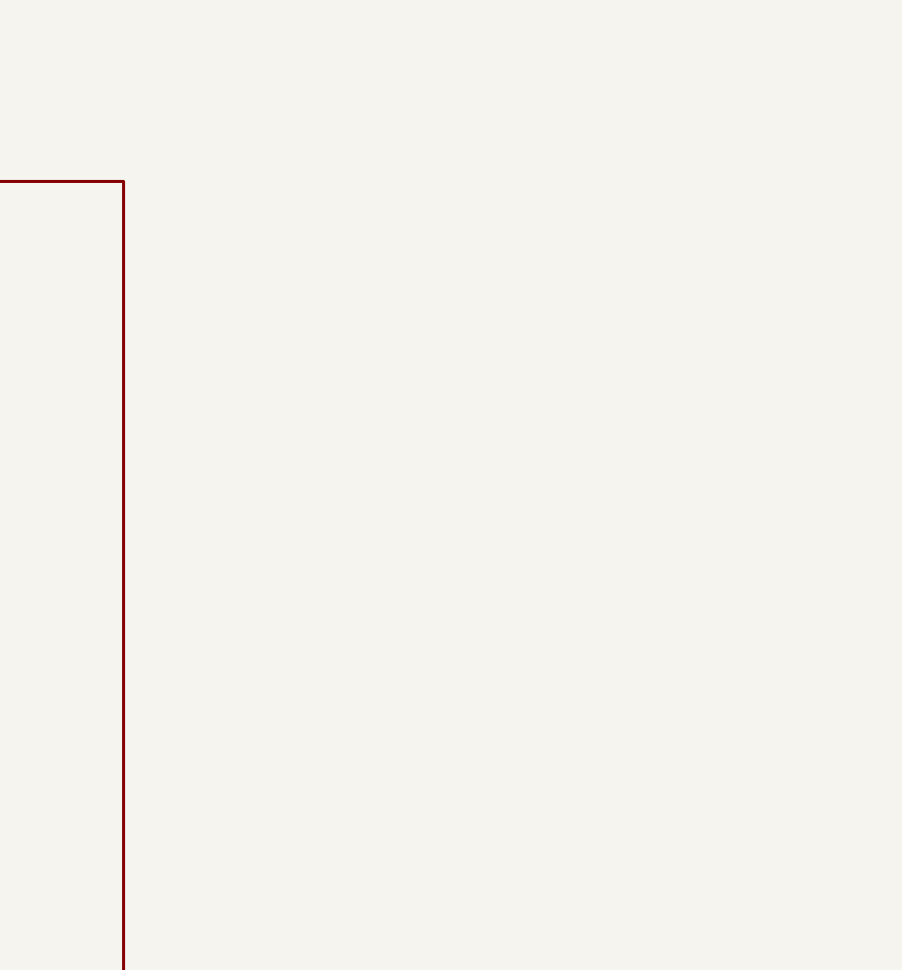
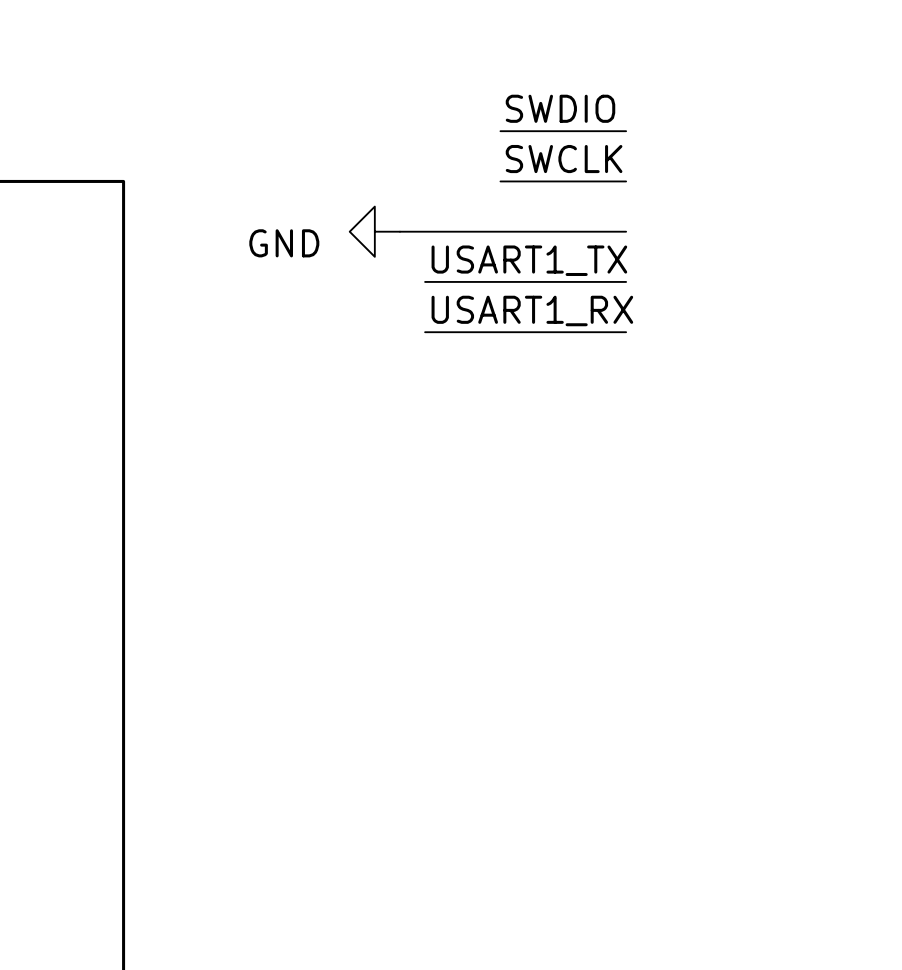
label: none -> SWDIO (560, 108)
wire: none -> (500, 131) (626, 131)
label: none -> SWCLK (564, 159)
wire: none -> (500, 181) (626, 181)
power symbol: none -> GND (374, 231)
wire: none -> (399, 231) (626, 231)
label: none -> USART1_TX (529, 260)
wire: none -> (425, 281) (626, 281)
label: none -> USART1_RX (532, 310)
wire: none -> (425, 332) (626, 332)

